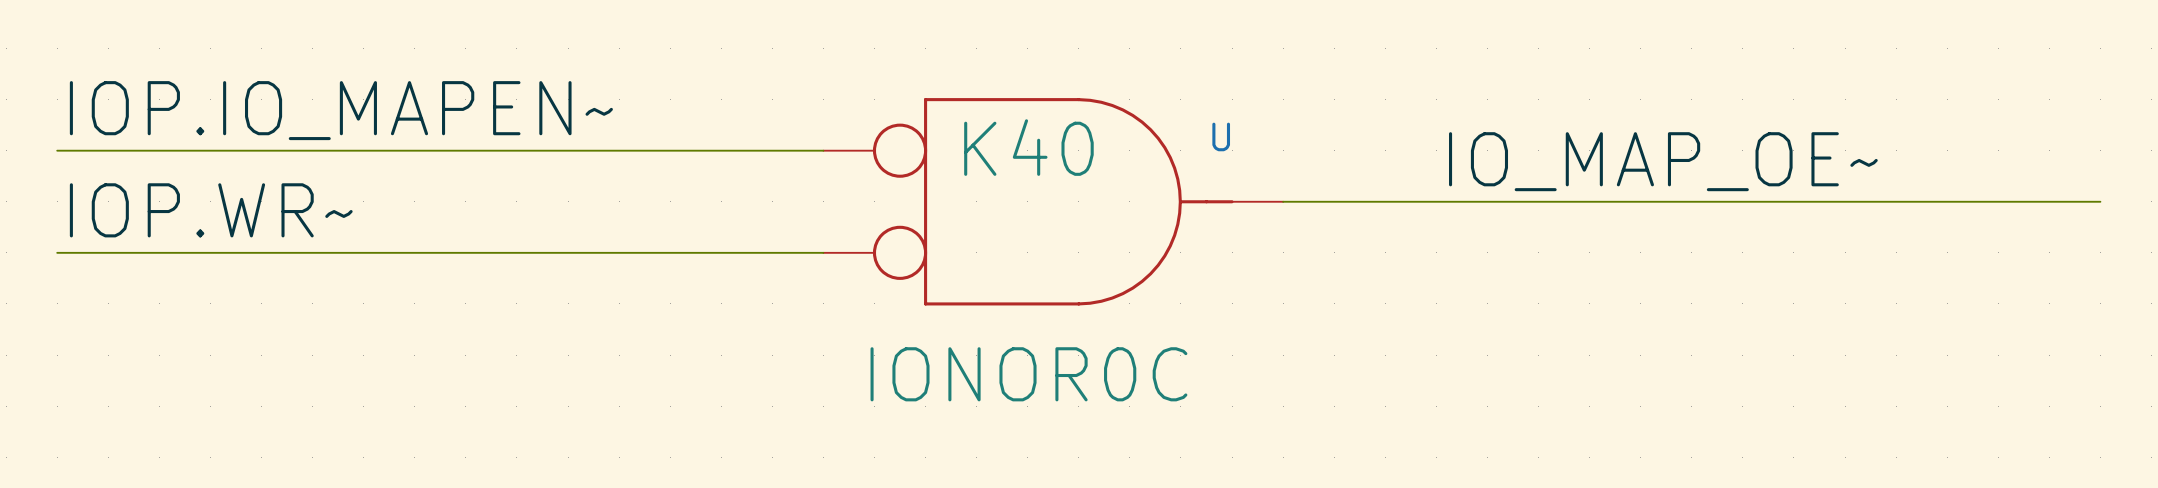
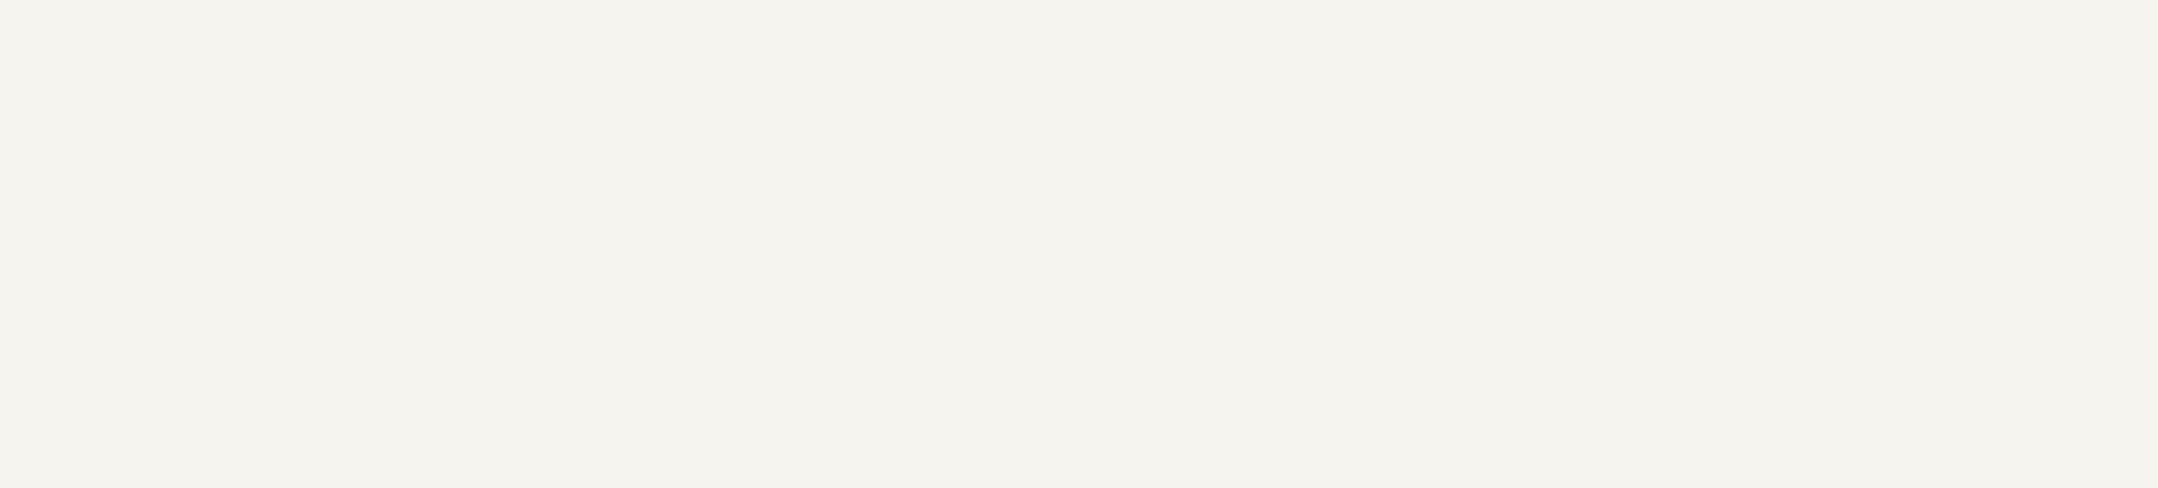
label: IOP.IO_MAPEN~ (341, 110) -> none
wire: (57, 150) (823, 150) -> none
label: IO_MAP_OE~ (1663, 161) -> none
U: (1053, 201) -> none
wire: (1283, 201) (2100, 201) -> none
label: IOP.WR~ (211, 210) -> none
wire: (57, 252) (823, 252) -> none

